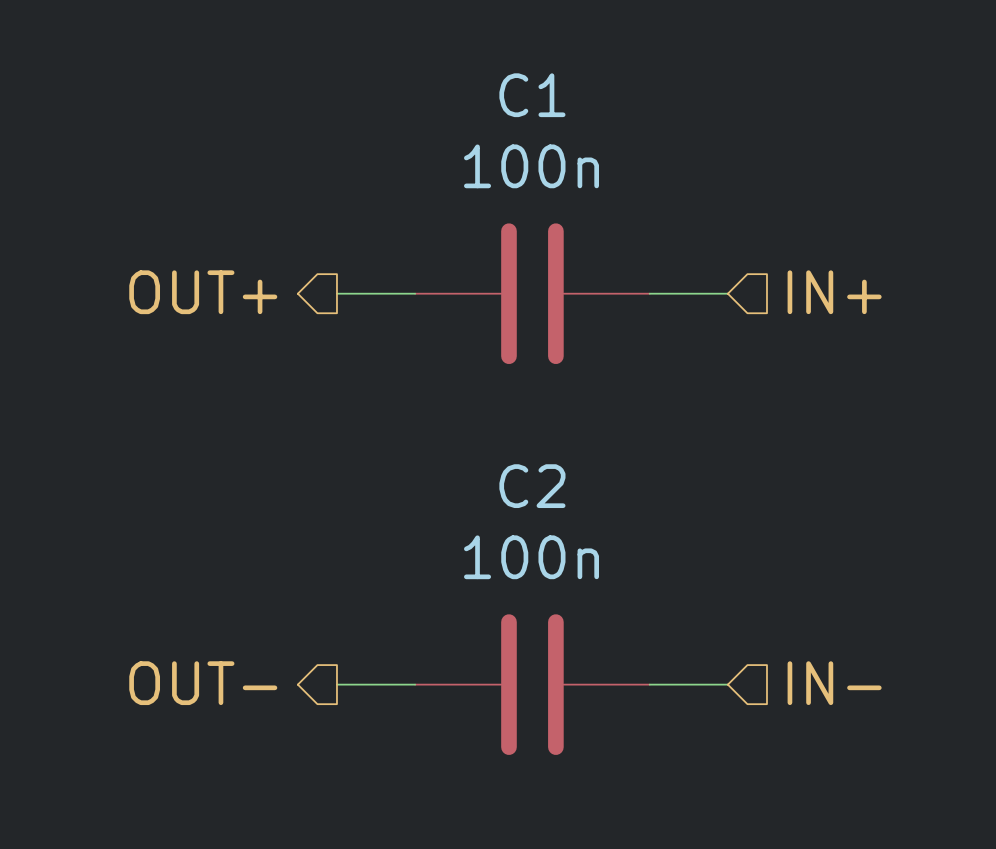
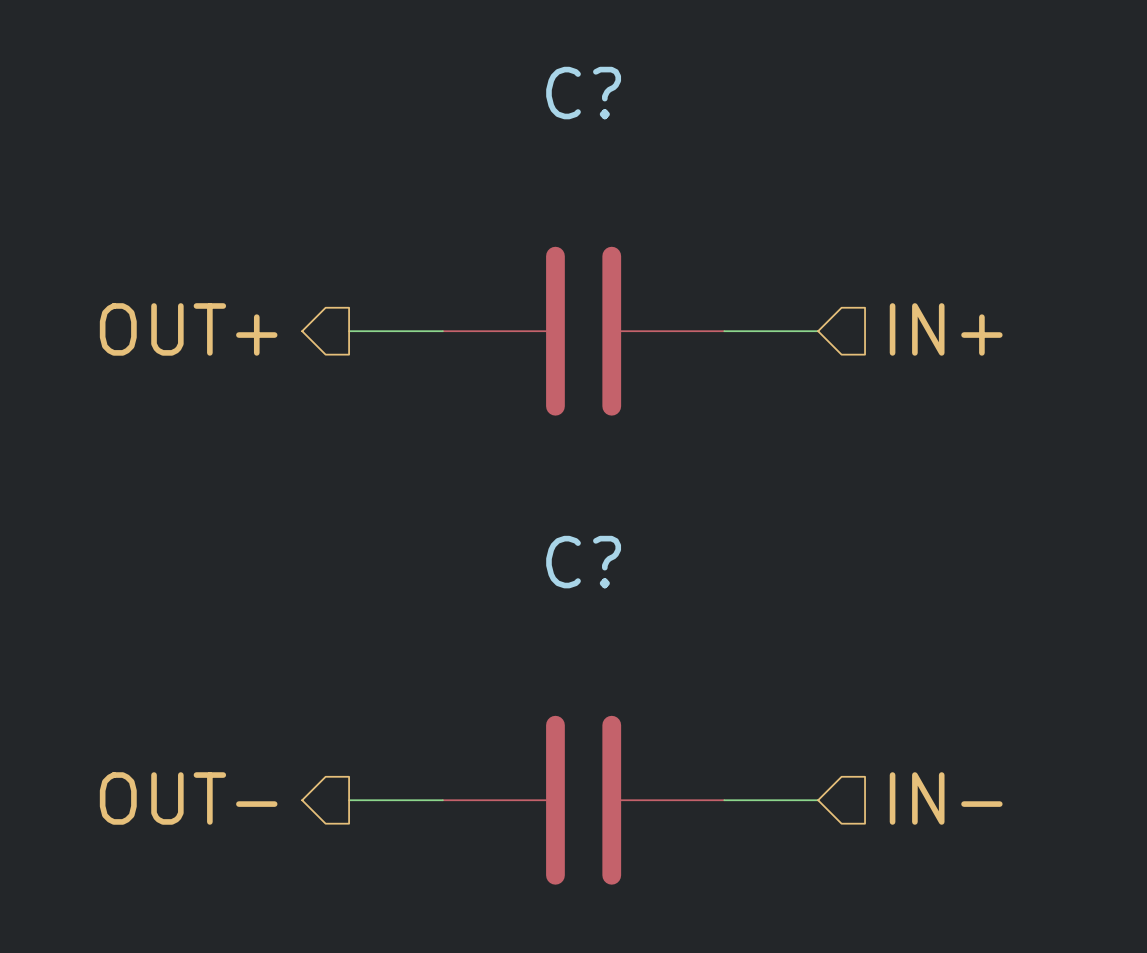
C1 name: C1 (532, 95) -> C? (583, 93)
C1 value: 100n (531, 166) -> none
C2 name: C2 (532, 486) -> C? (583, 562)
C2 value: 100n (531, 557) -> none

